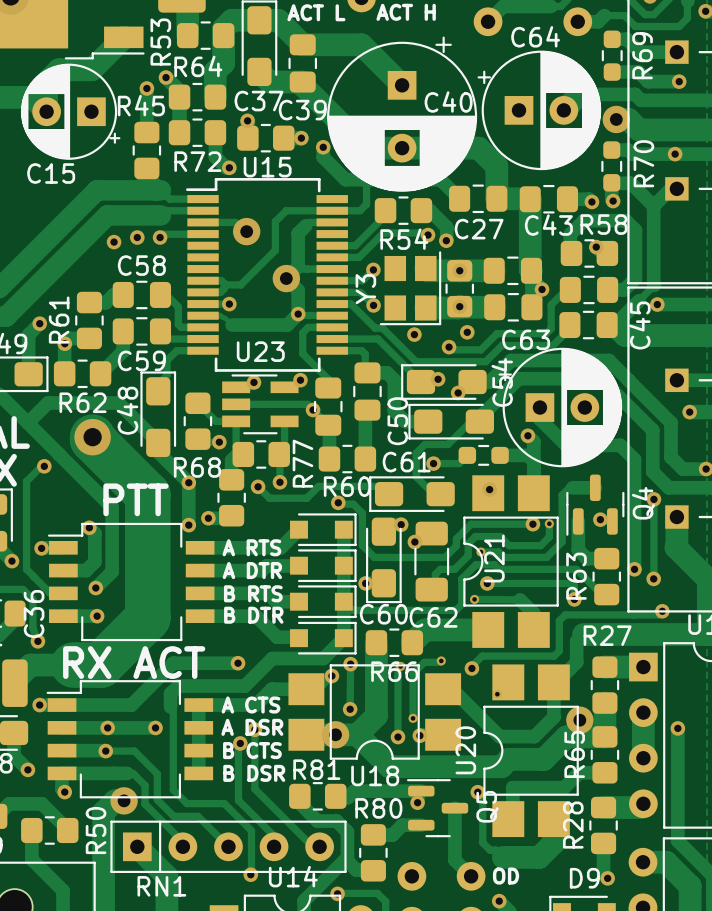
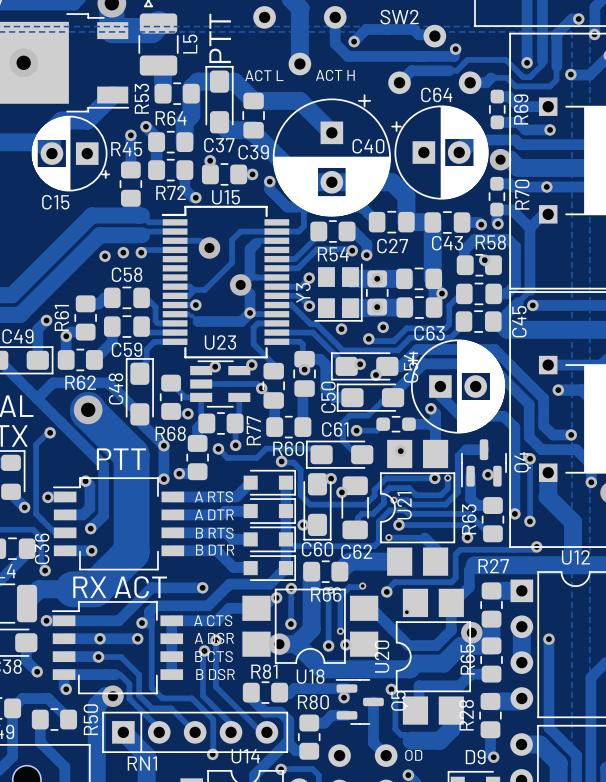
via: none -> (304, 369)
via: none -> (142, 623)

